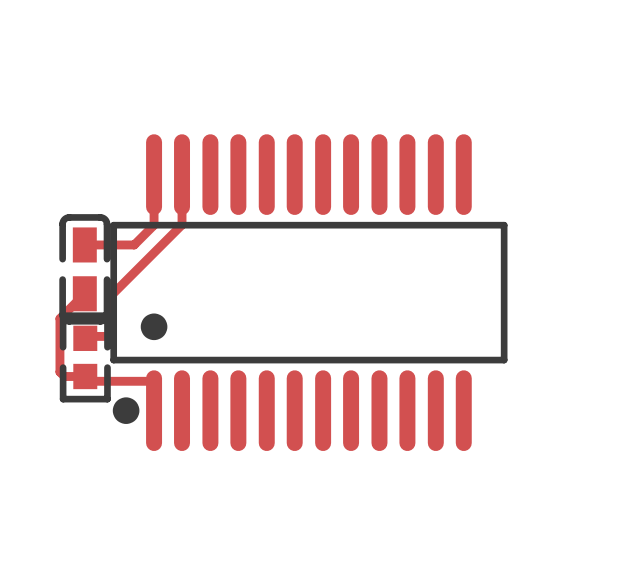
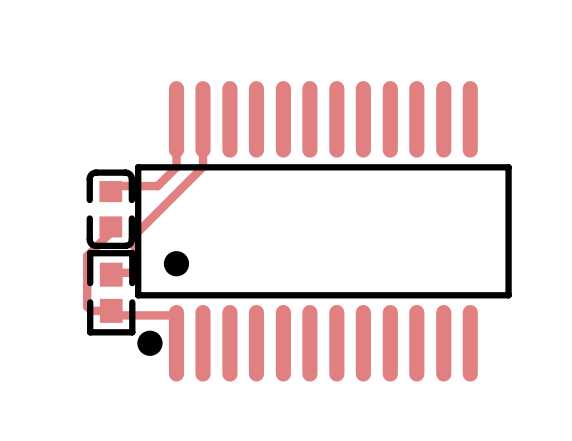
part footprint: [59, 214, 111, 325] -> [86, 169, 136, 250]

